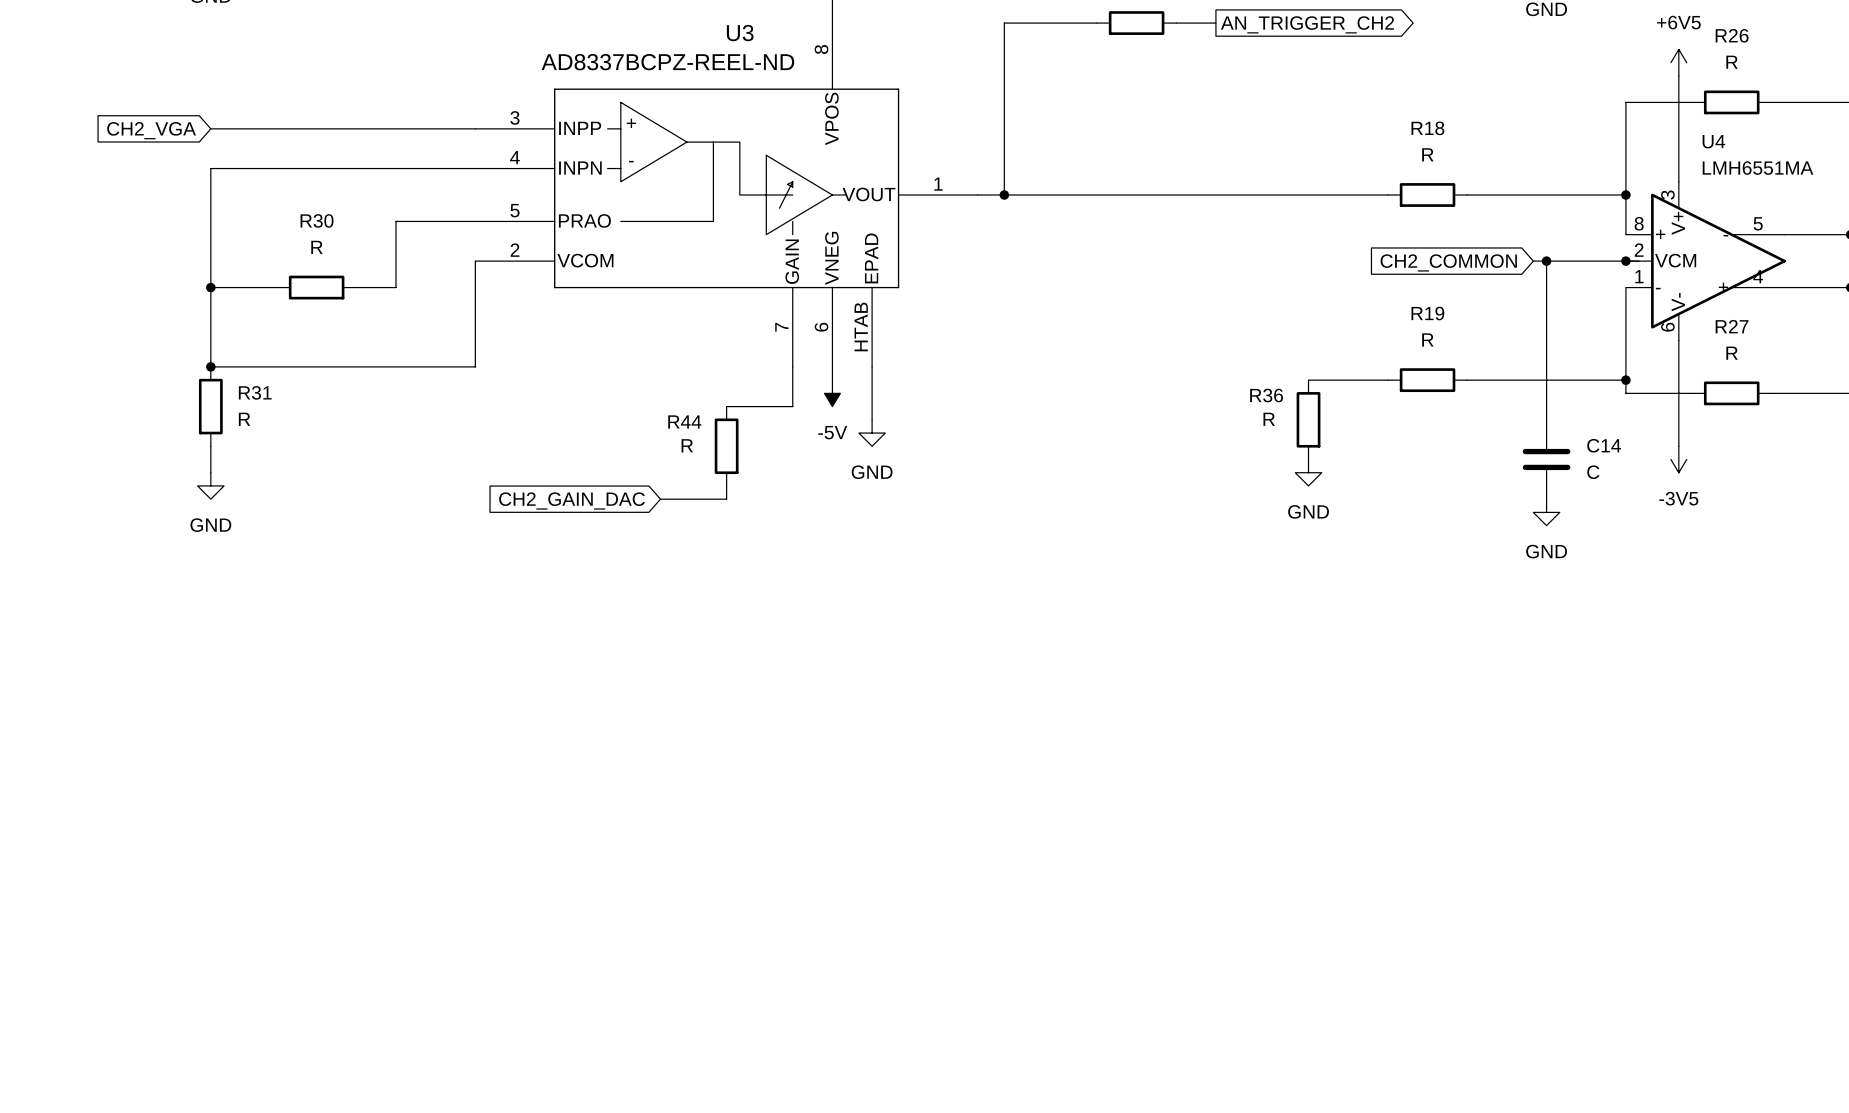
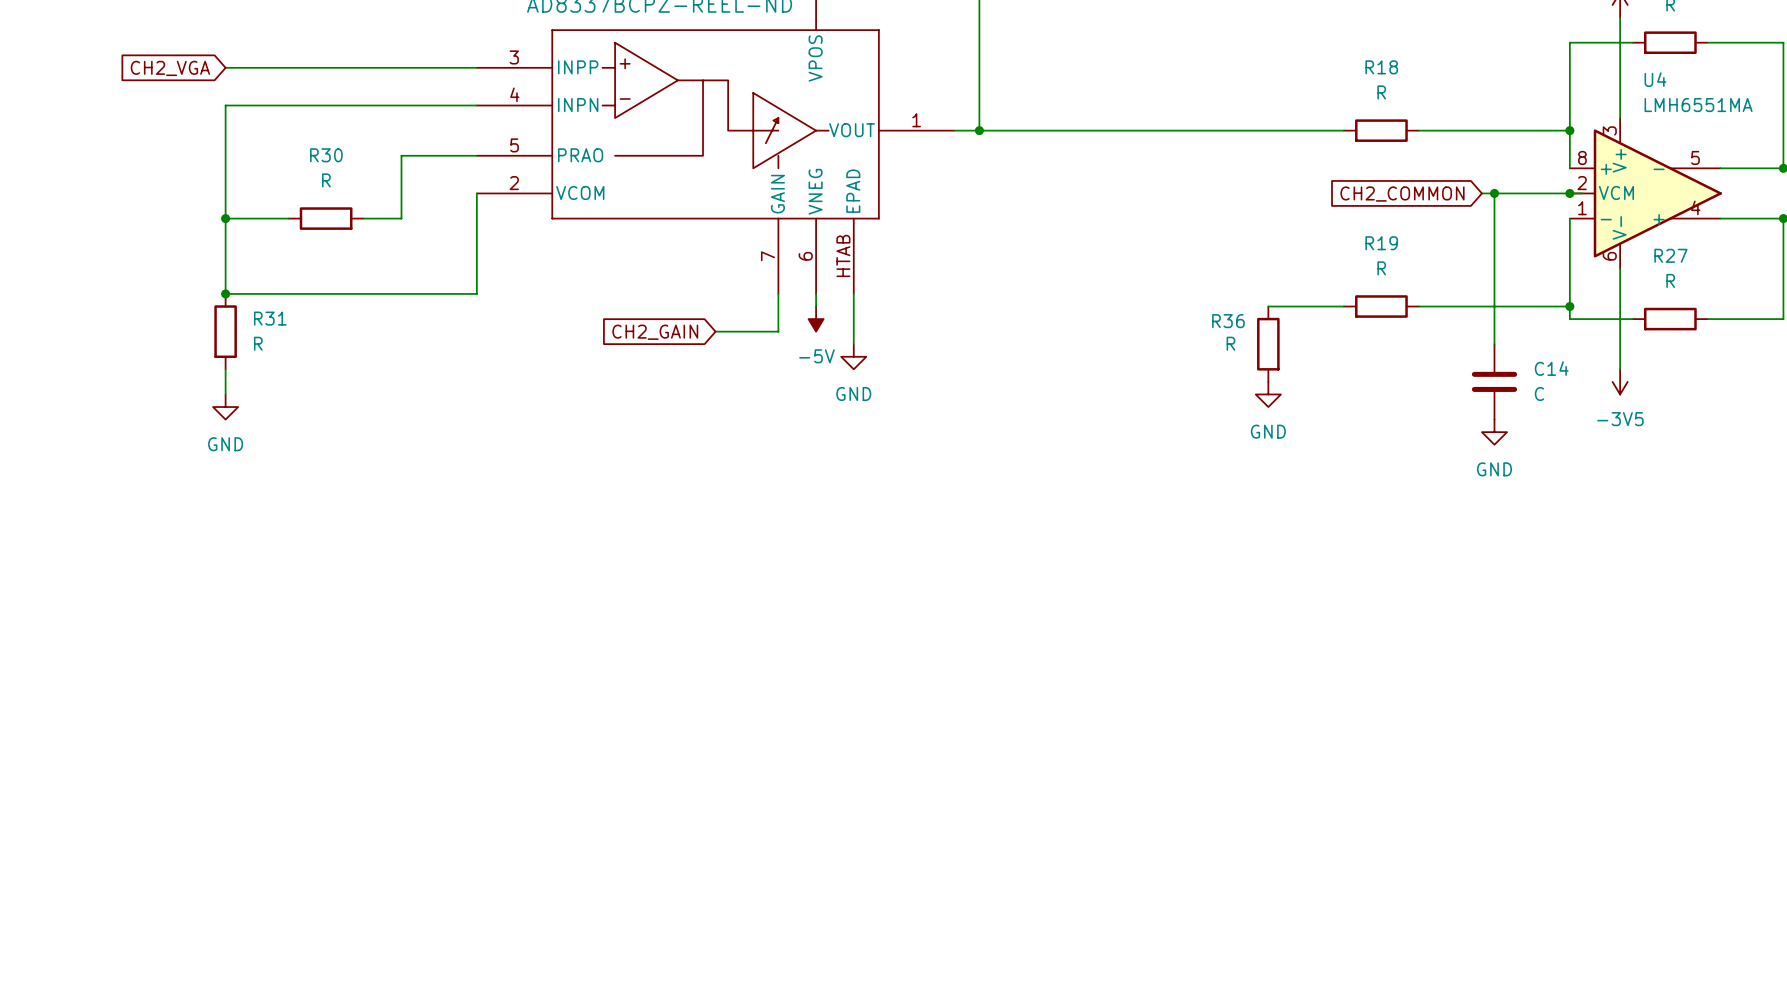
global label: none -> CH2_GAIN (655, 332)
R44: R (726, 446) -> none
wire: (726, 485) (726, 499) (660, 499) -> none
global label: CH2_GAIN_DAC (572, 500) -> none

